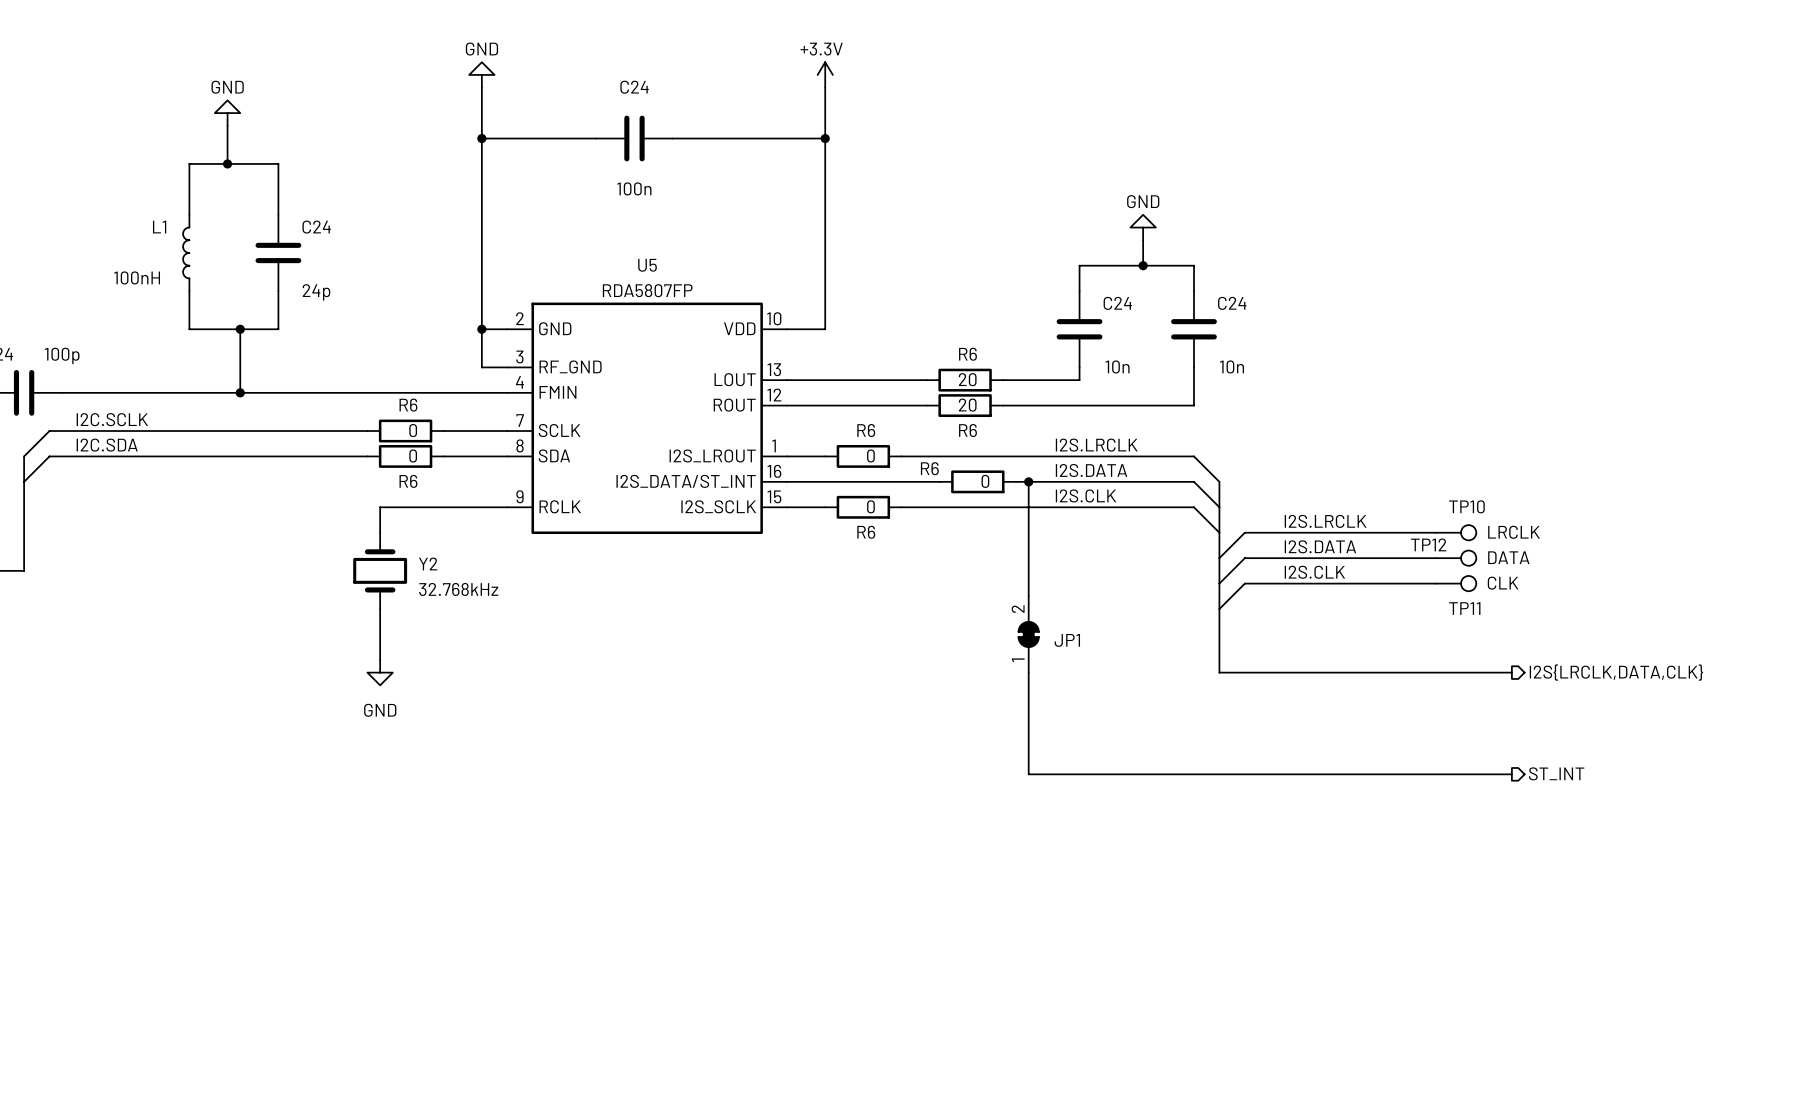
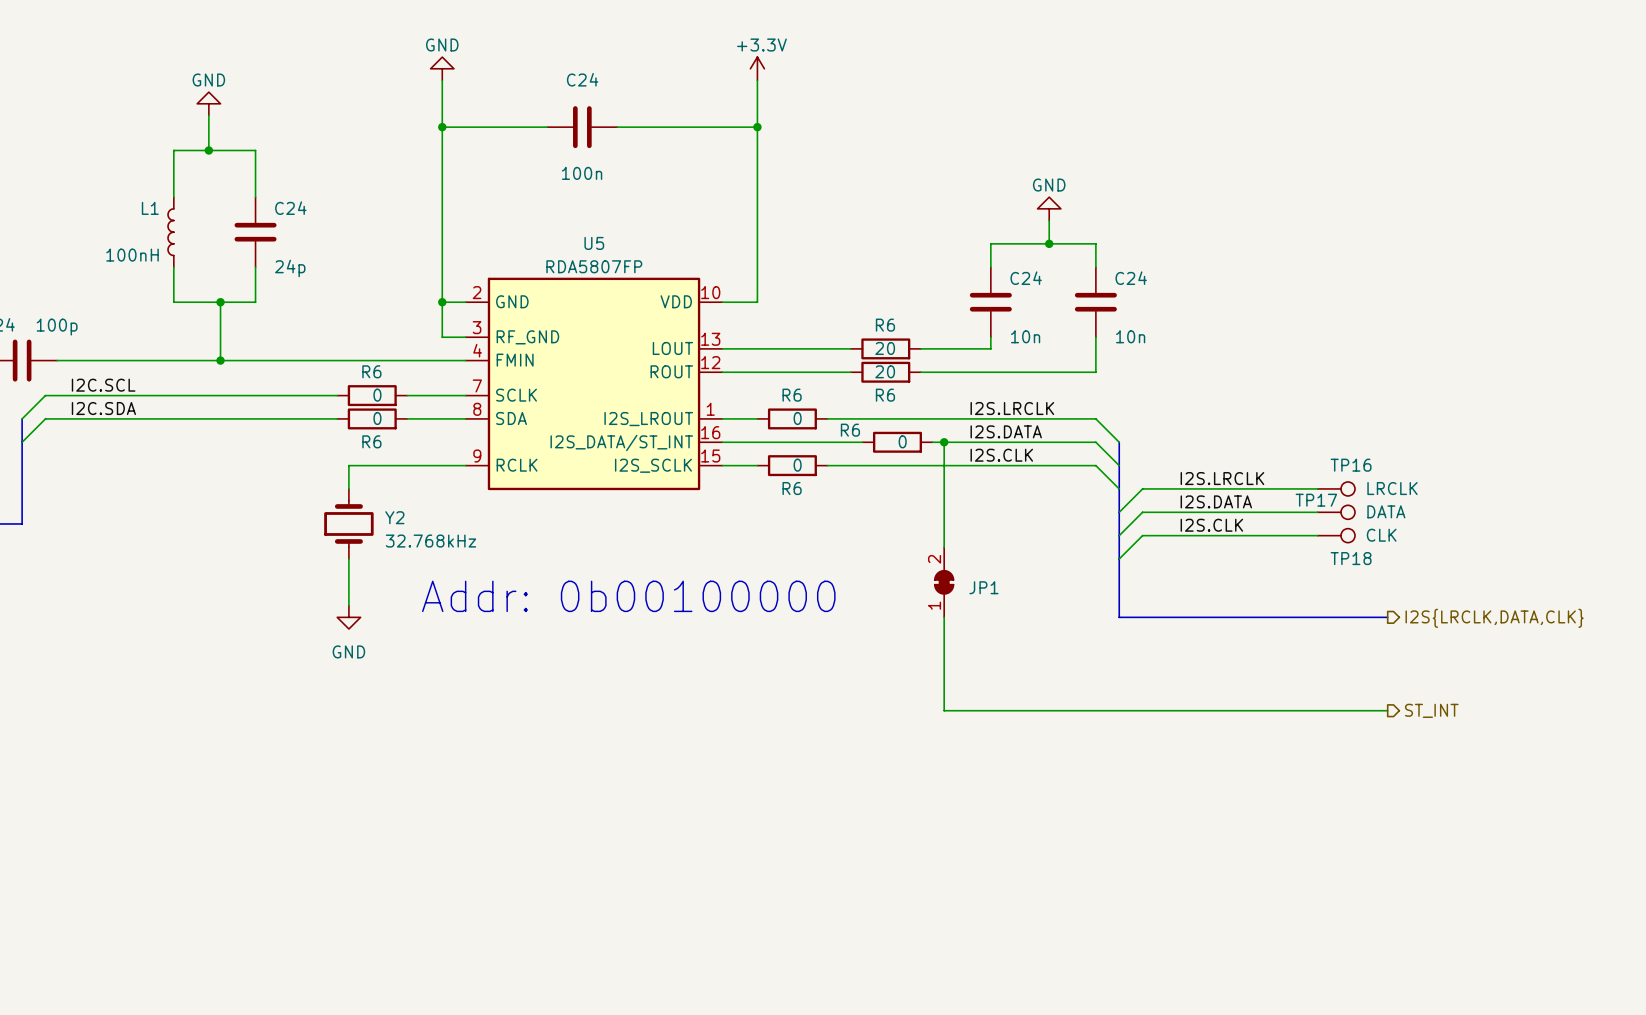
label: I2C.SCLK (112, 419) -> I2C.SCL (103, 385)
TP10 name: TP10 (1466, 506) -> TP16 (1351, 465)
TP12 name: TP12 (1428, 544) -> TP17 (1316, 500)
TP11 name: TP11 (1464, 608) -> TP18 (1351, 558)
text: none -> Addr: 0b00100000 (628, 596)

